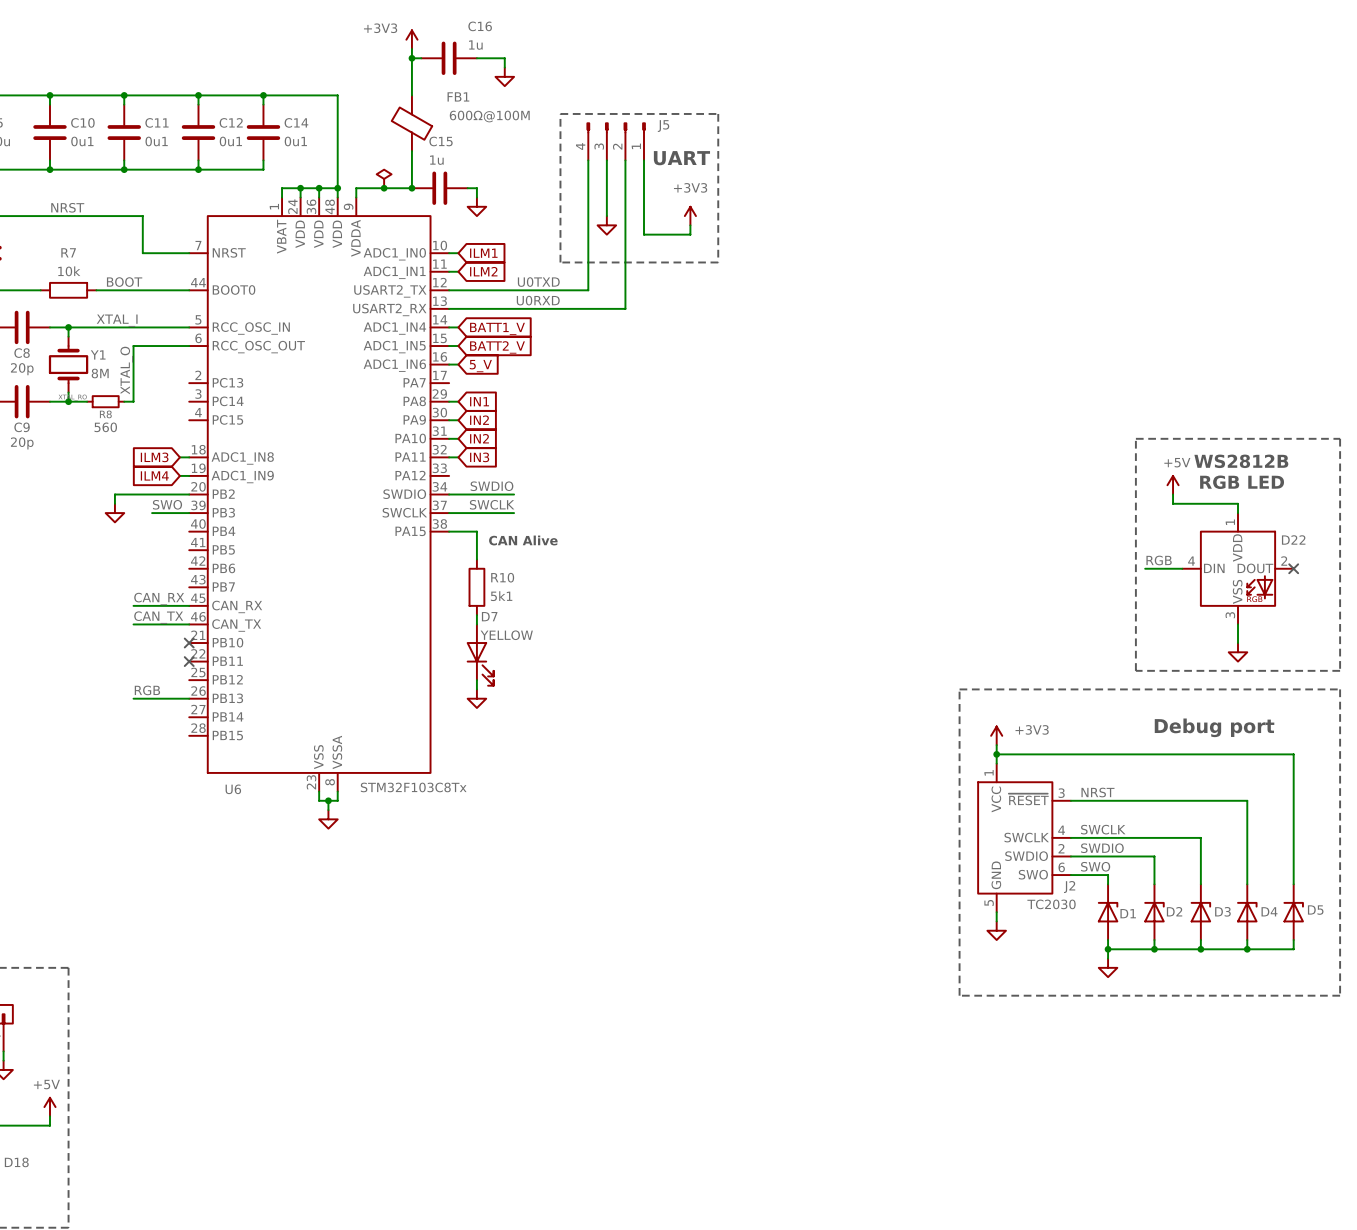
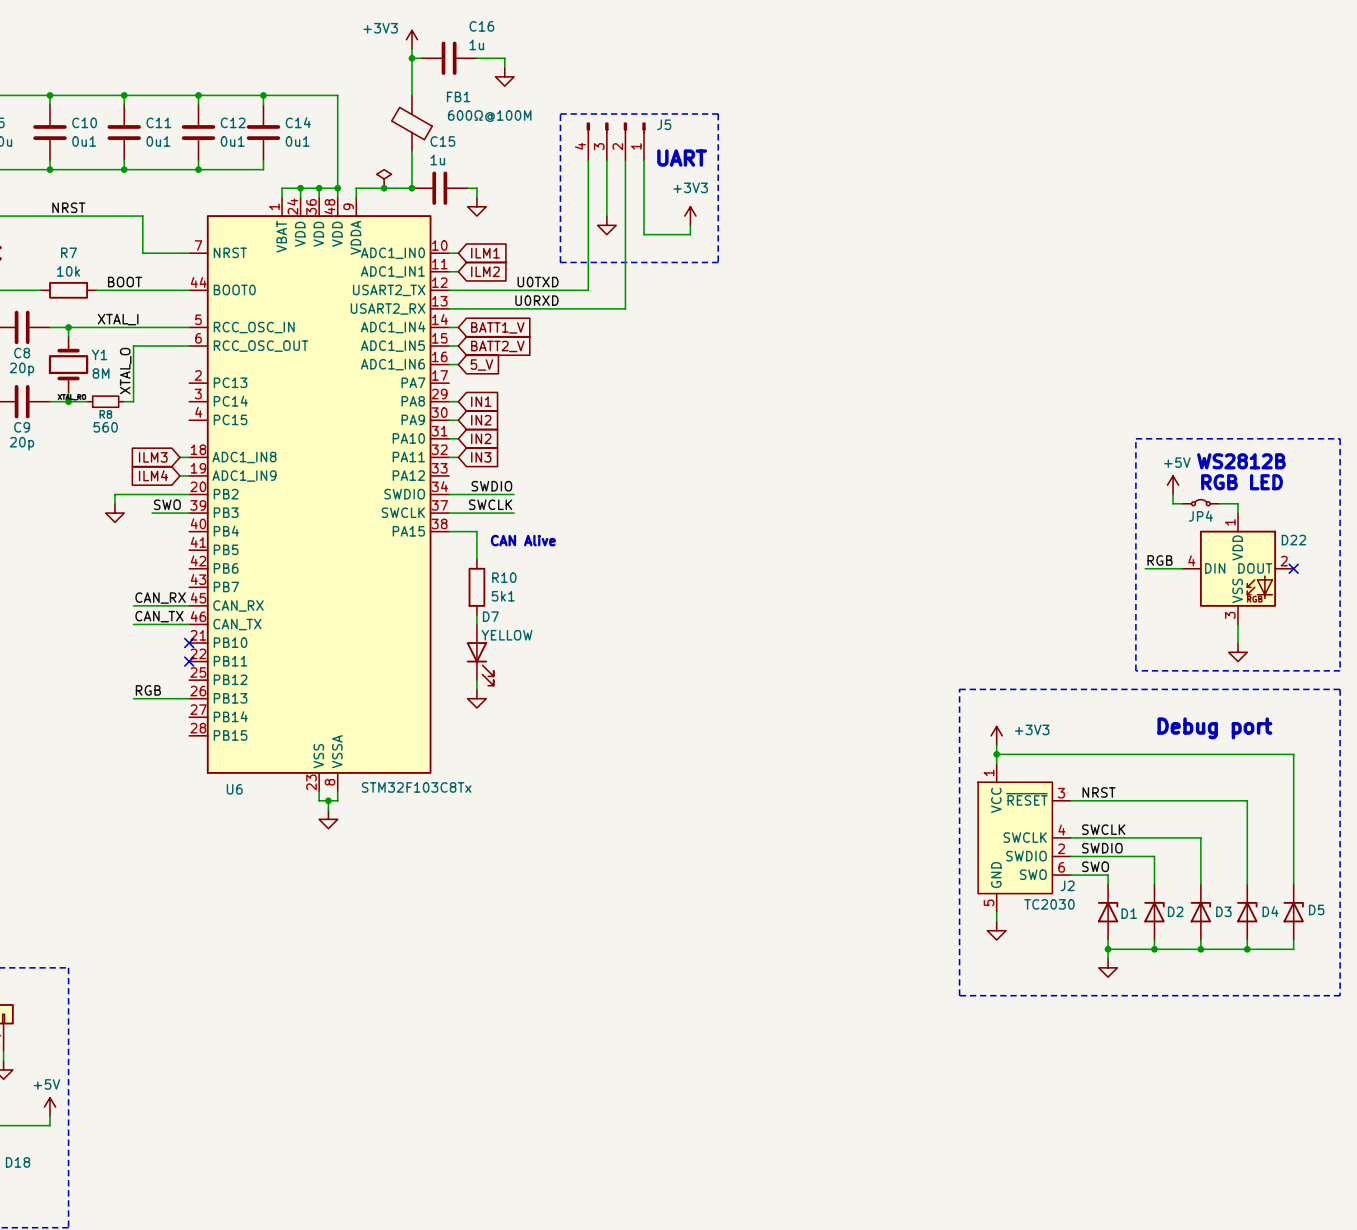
JP4: none -> (1200, 502)

